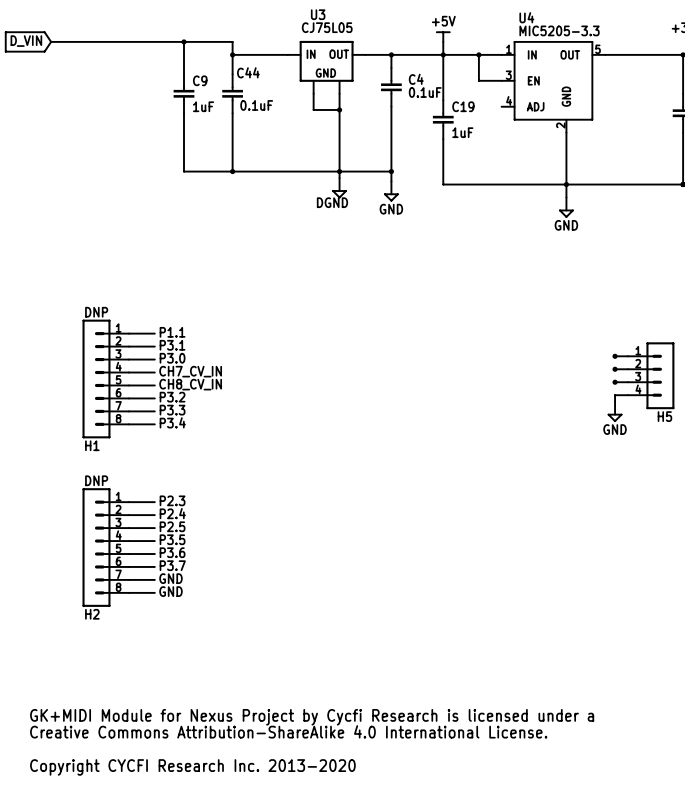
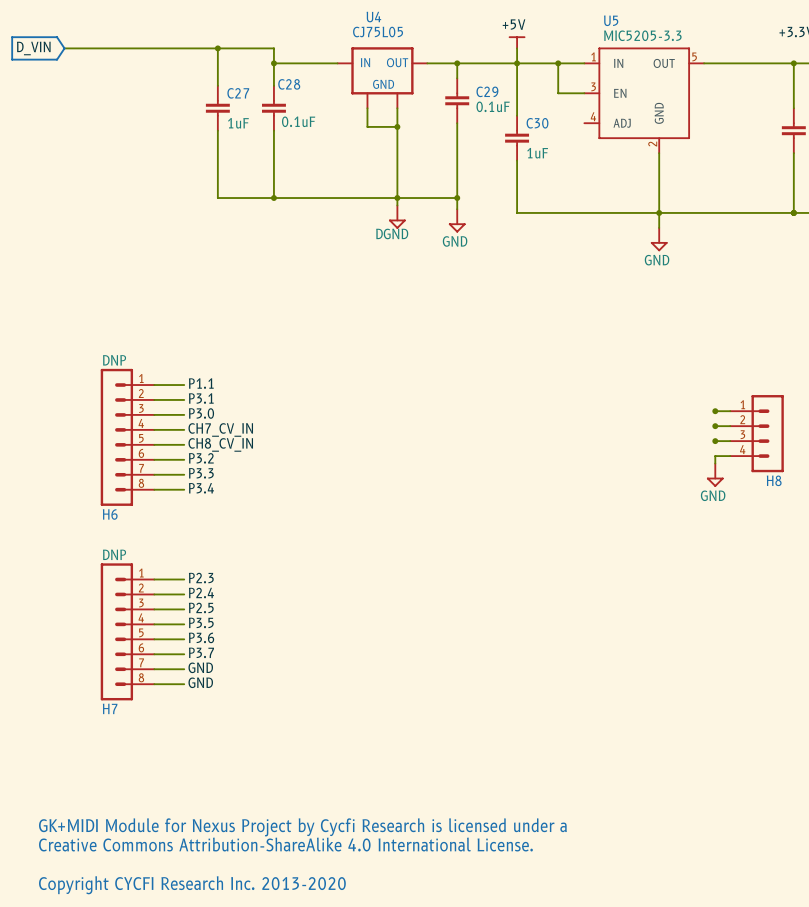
U3 name: U3 (318, 14) -> U4 (373, 17)
U4 name: U4 (526, 17) -> U5 (611, 20)
C44 name: C44 (248, 72) -> C28 (289, 84)
C4 name: C4 (416, 79) -> C29 (487, 91)
C9 name: C9 (200, 80) -> C27 (238, 93)
C19 name: C19 (463, 106) -> C30 (537, 123)
H5 name: H5 (664, 416) -> H8 (774, 480)
H1 name: H1 (92, 445) -> H6 (110, 514)
H2 name: H2 (92, 614) -> H7 (110, 708)

